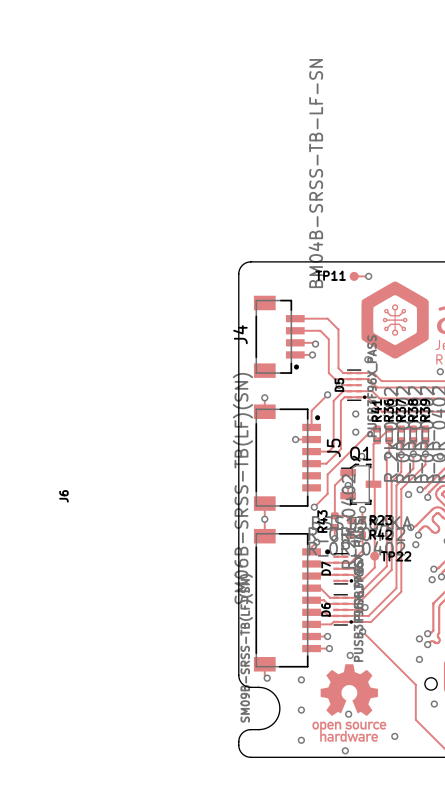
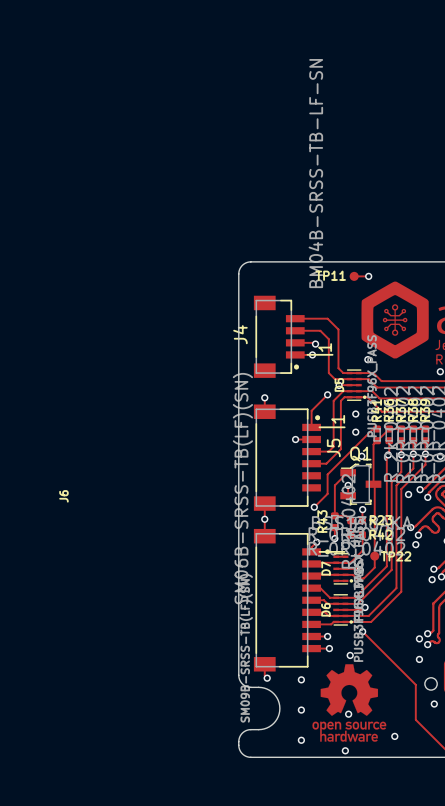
text: none -> 1 (325, 347)
line: none -> (307, 354) (332, 354)
text: none -> 1 (338, 419)
line: none -> (319, 427) (344, 427)
line: none -> (319, 551) (344, 551)

